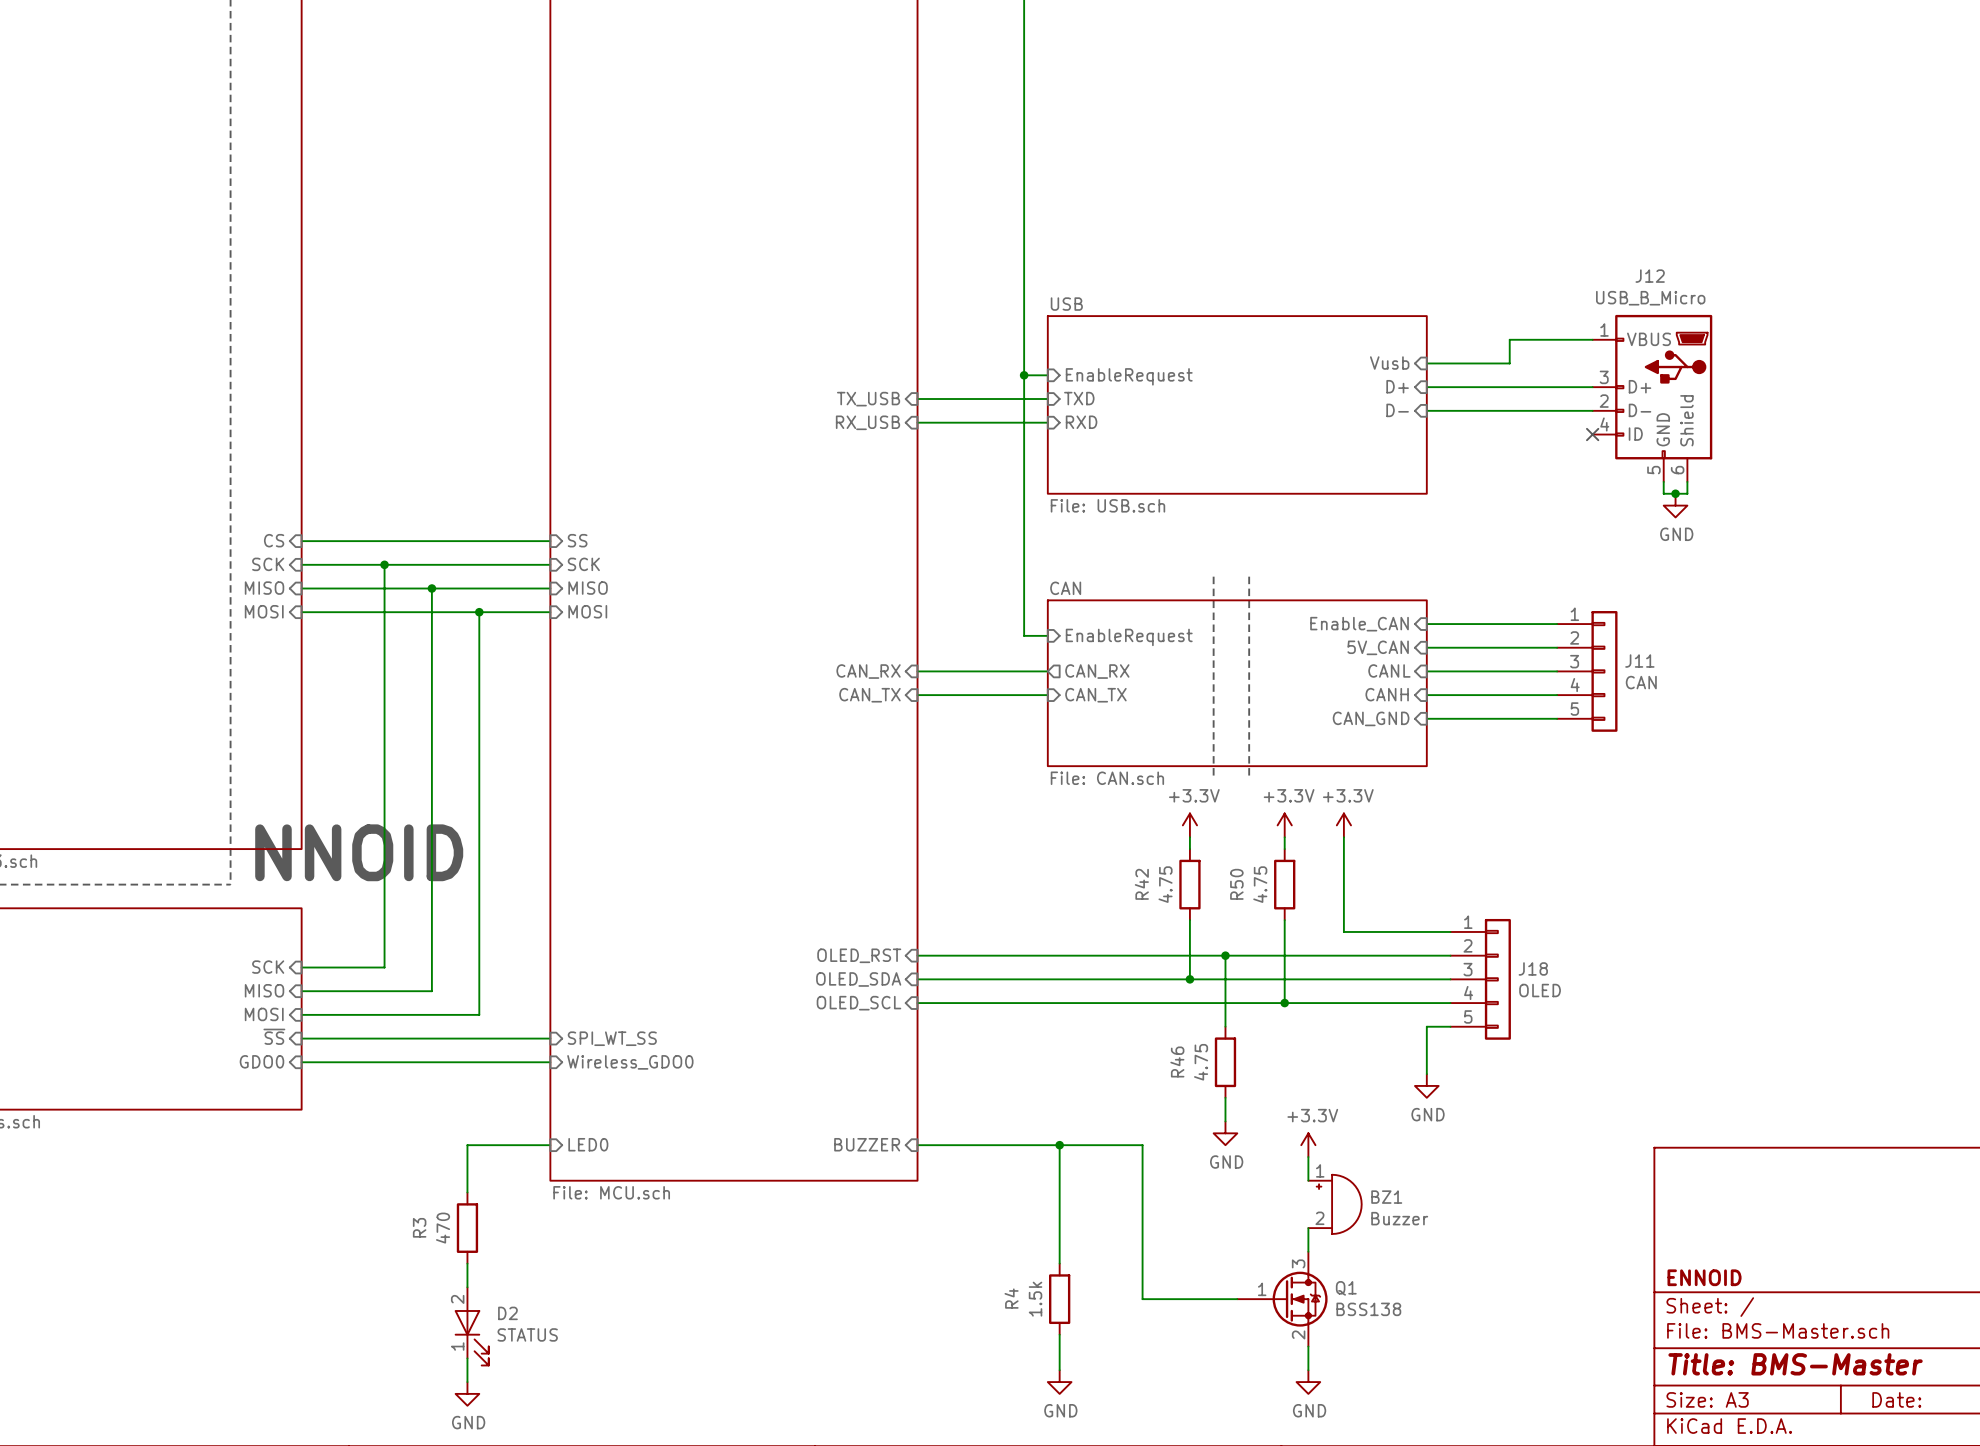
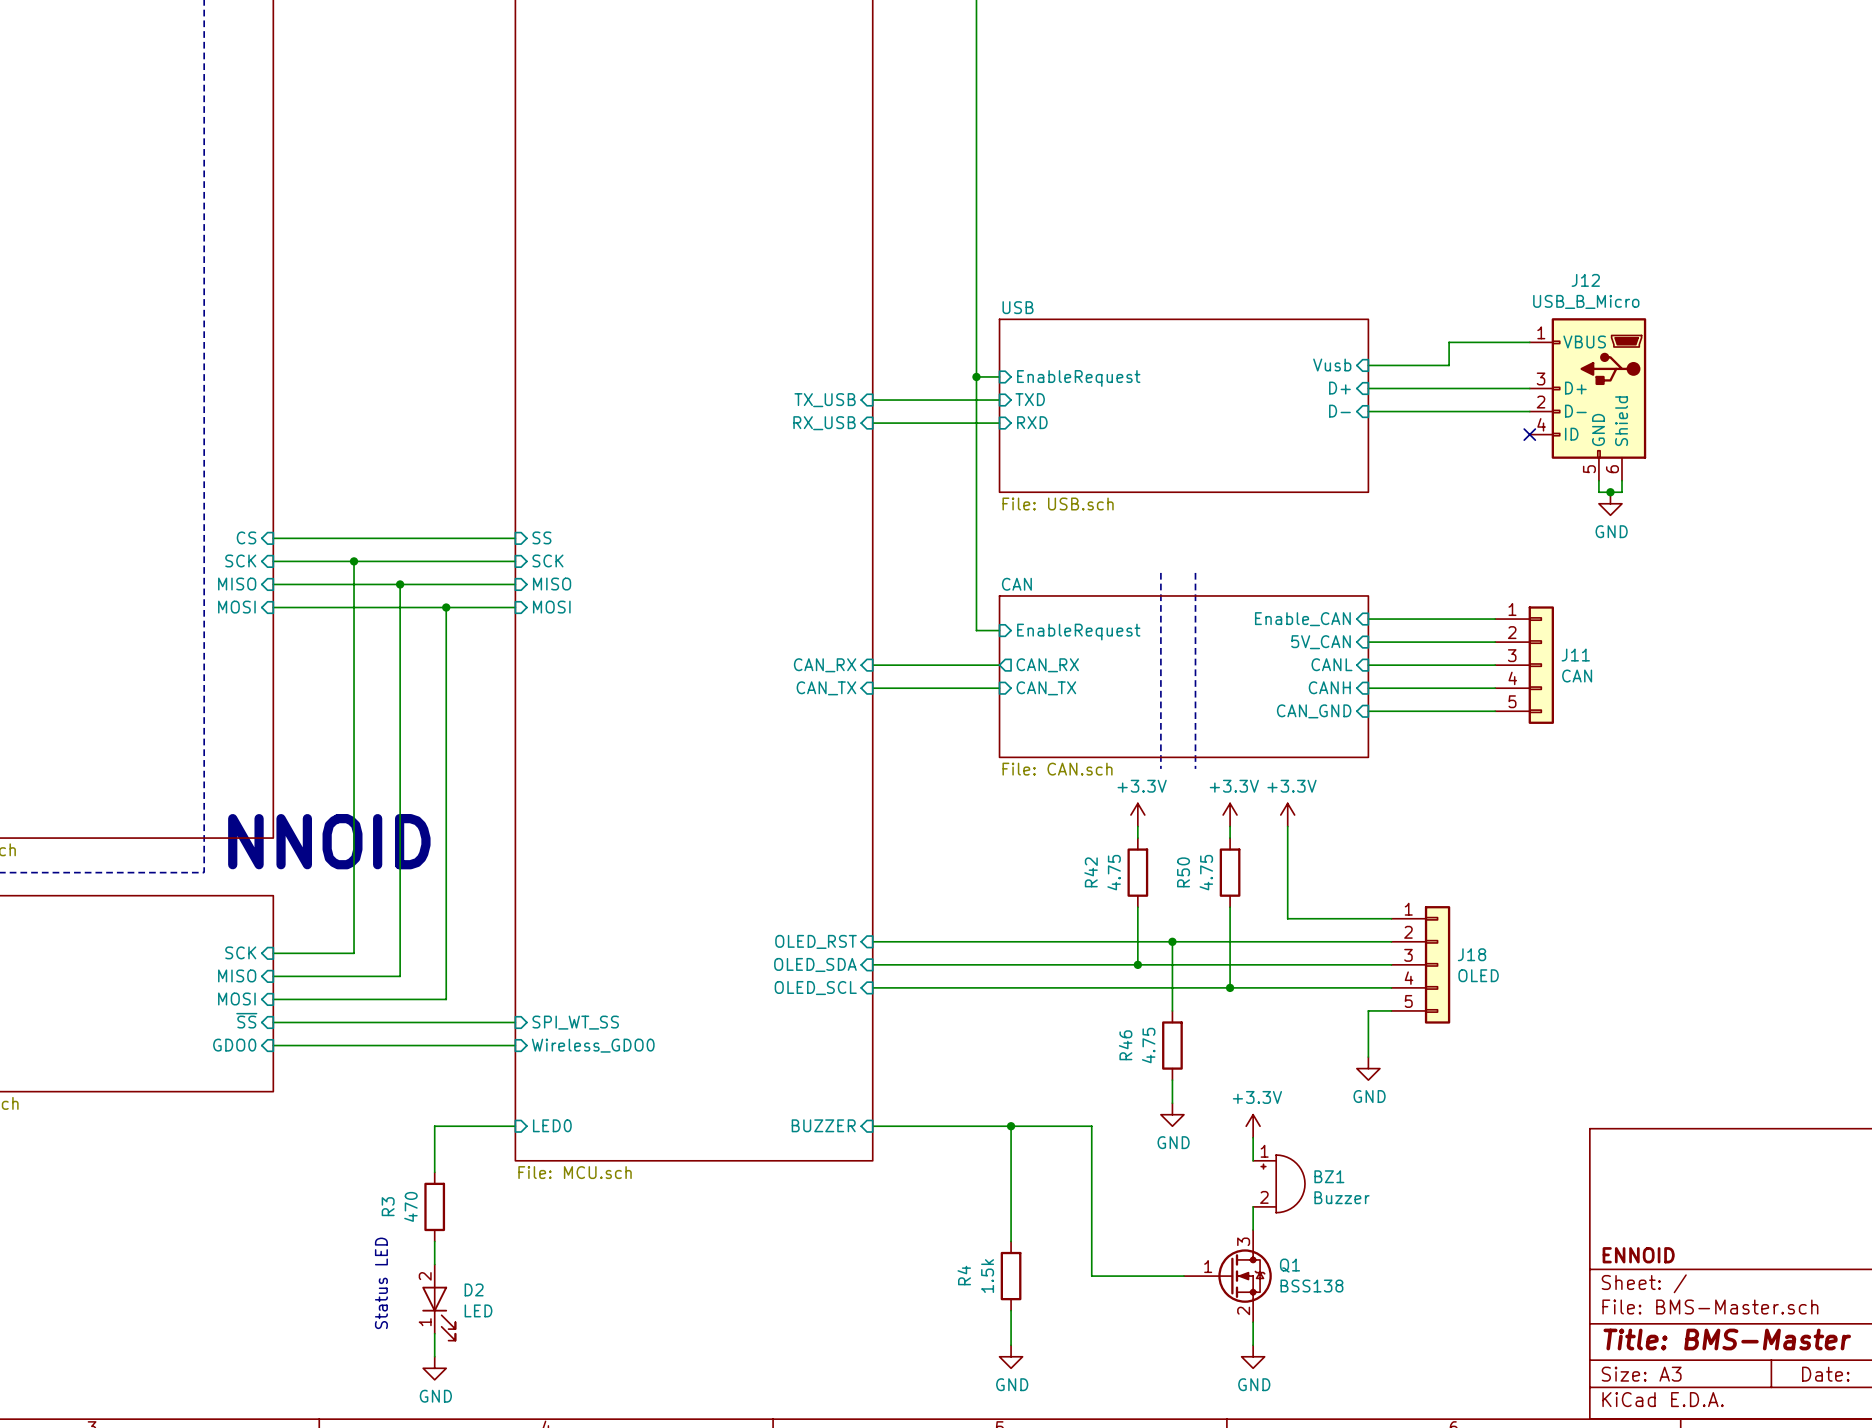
text: none -> Status LED (381, 1283)
D2 value: STATUS (527, 1334) -> LED (478, 1310)

